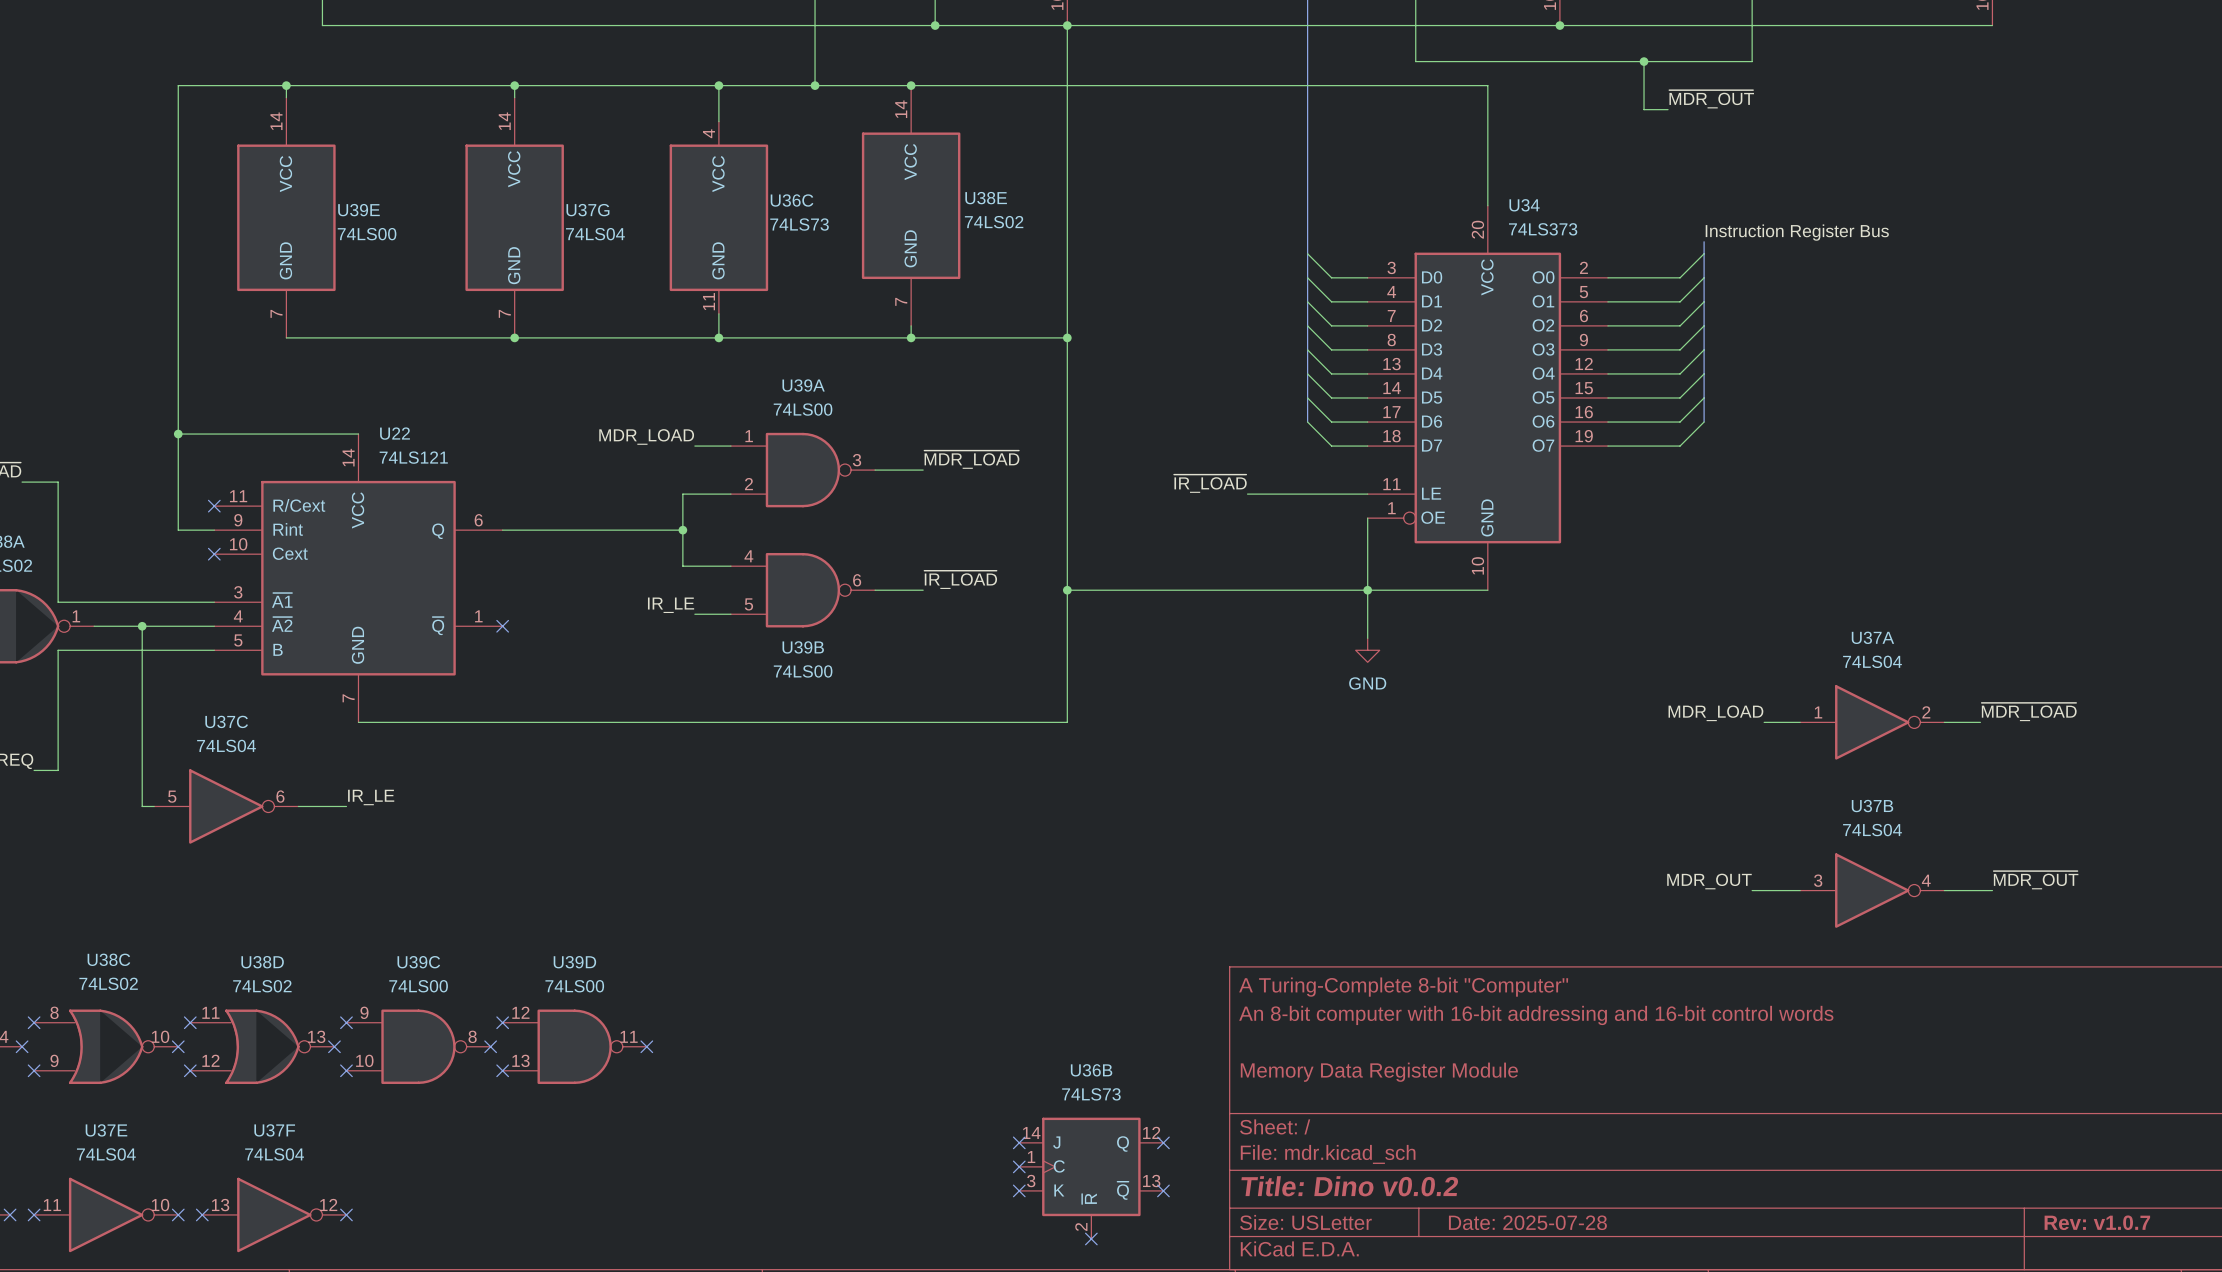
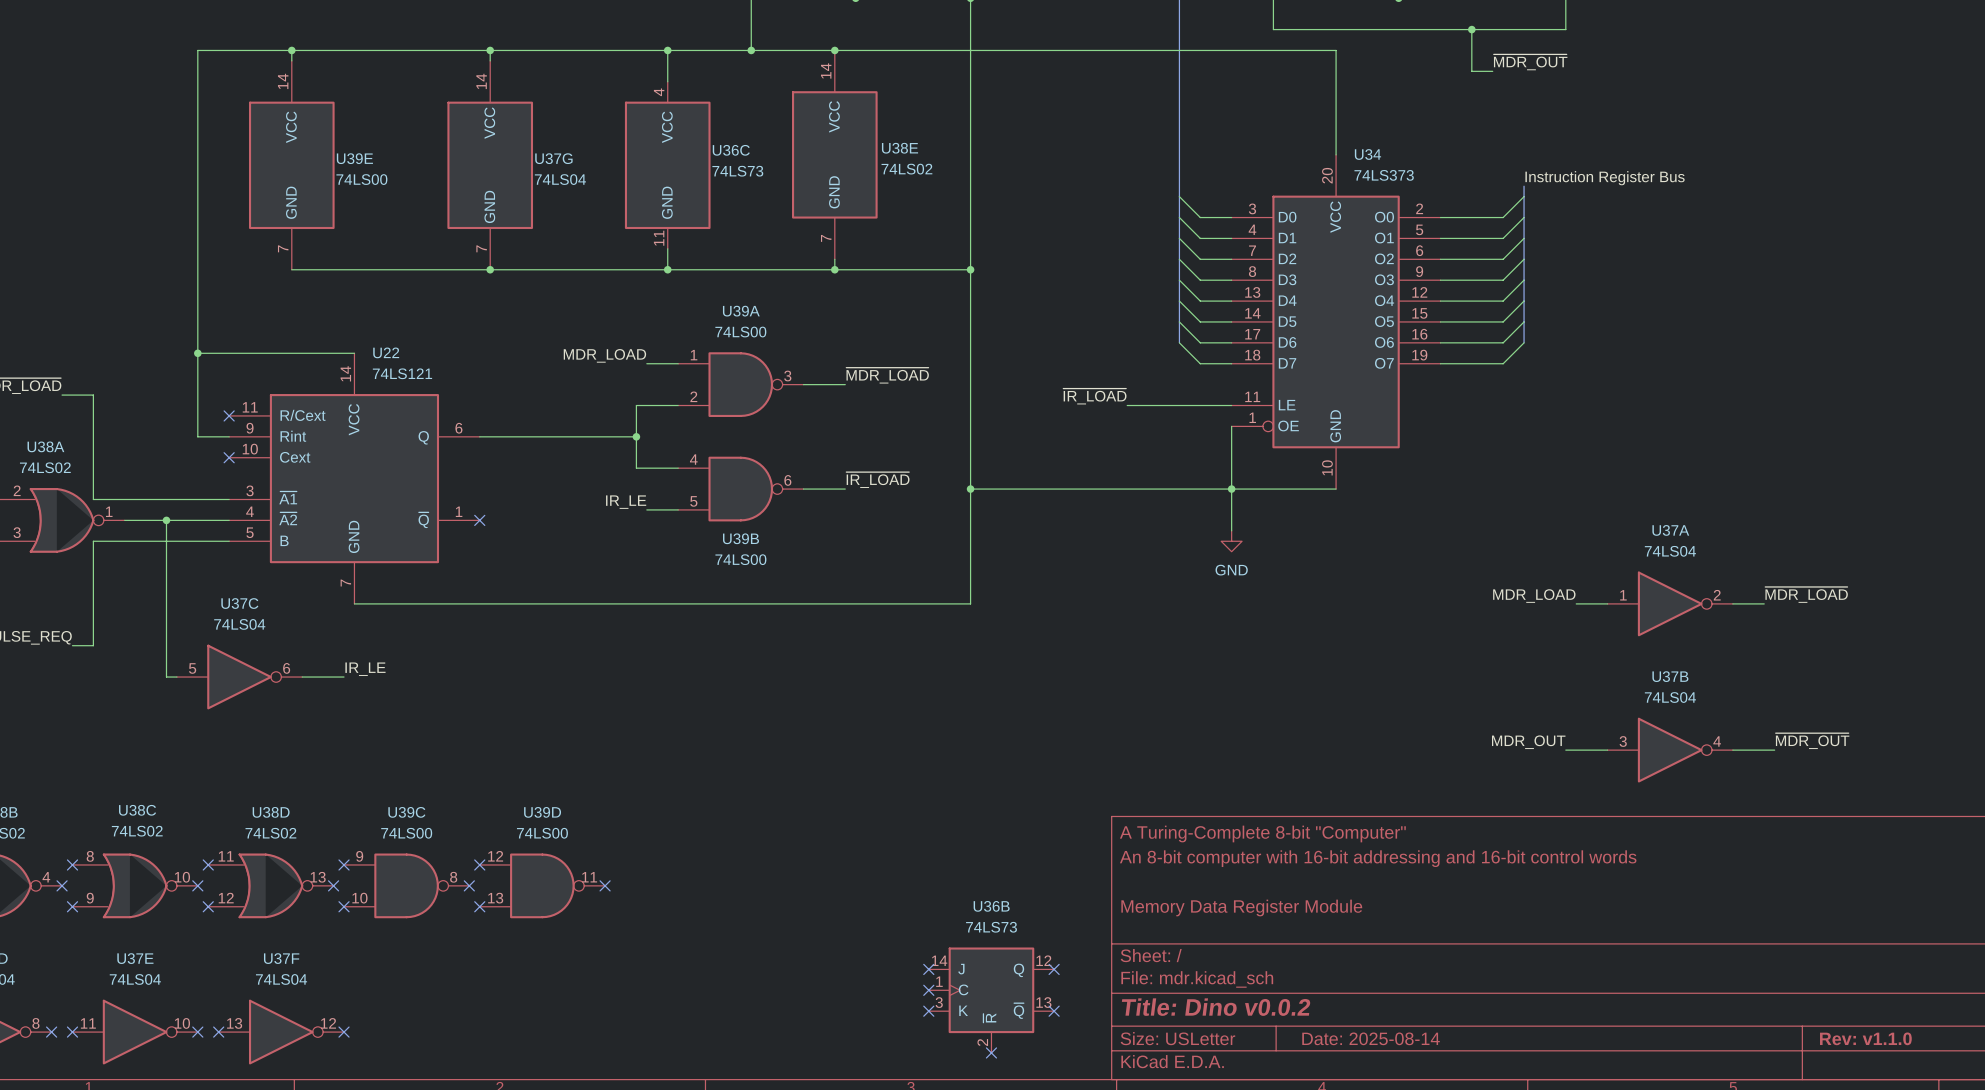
title block: Date: 2025-07-28 (1527, 1222) -> Date: 2025-08-14 (1371, 1038)
title block: Rev: v1.0.7 (2097, 1222) -> Rev: v1.1.0 (1865, 1038)

